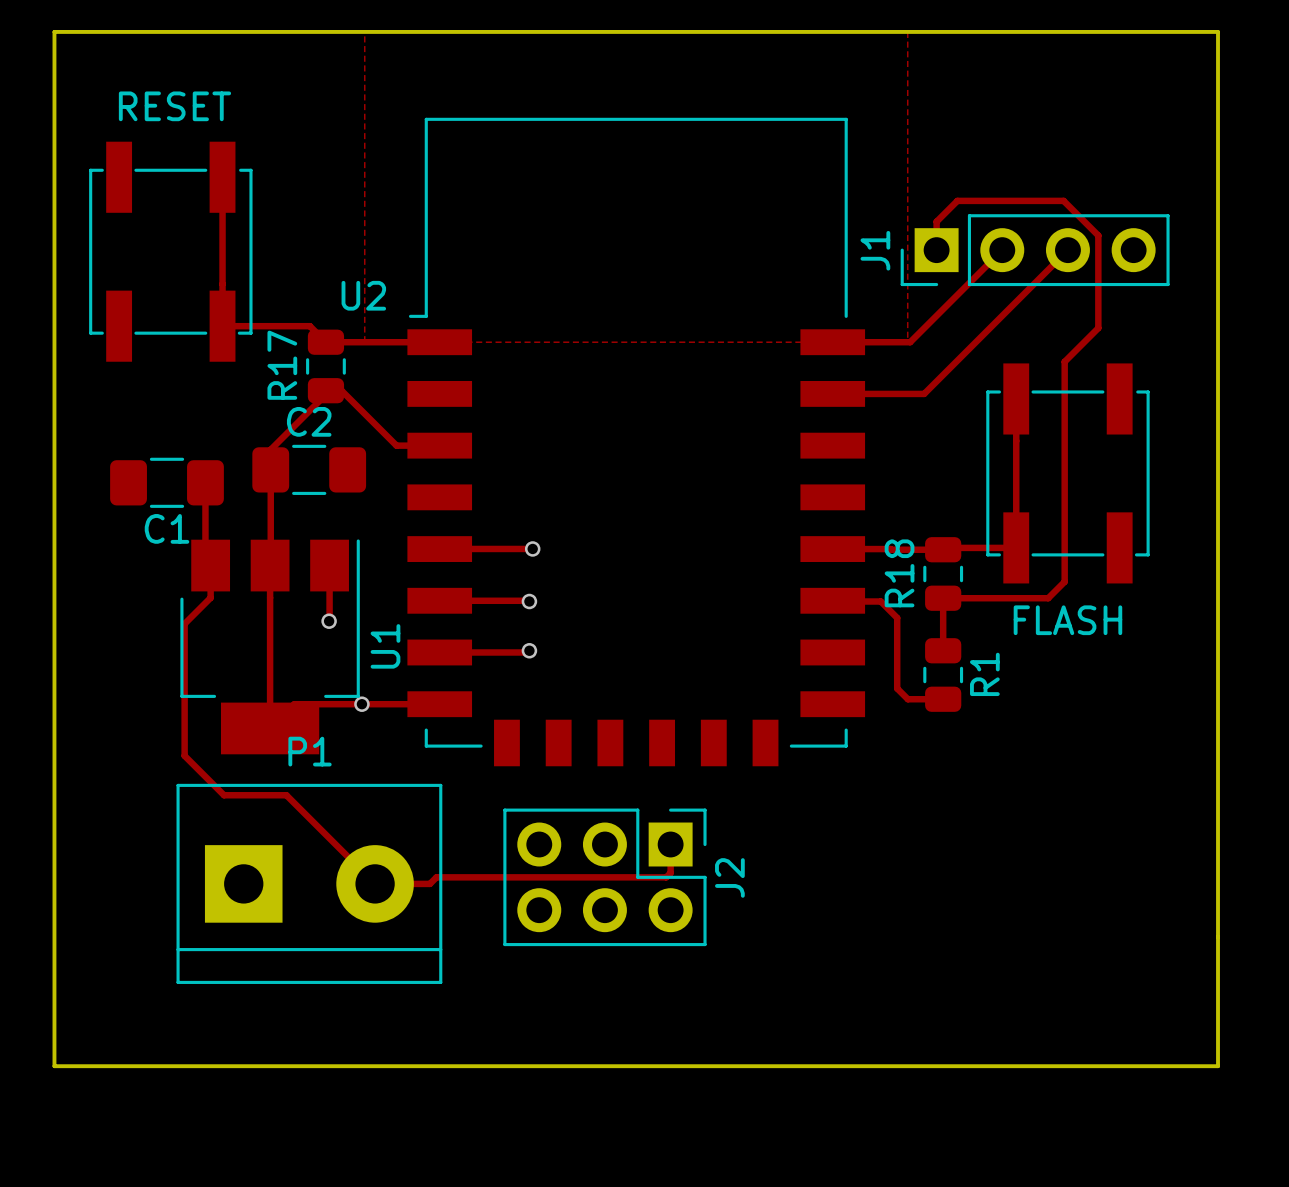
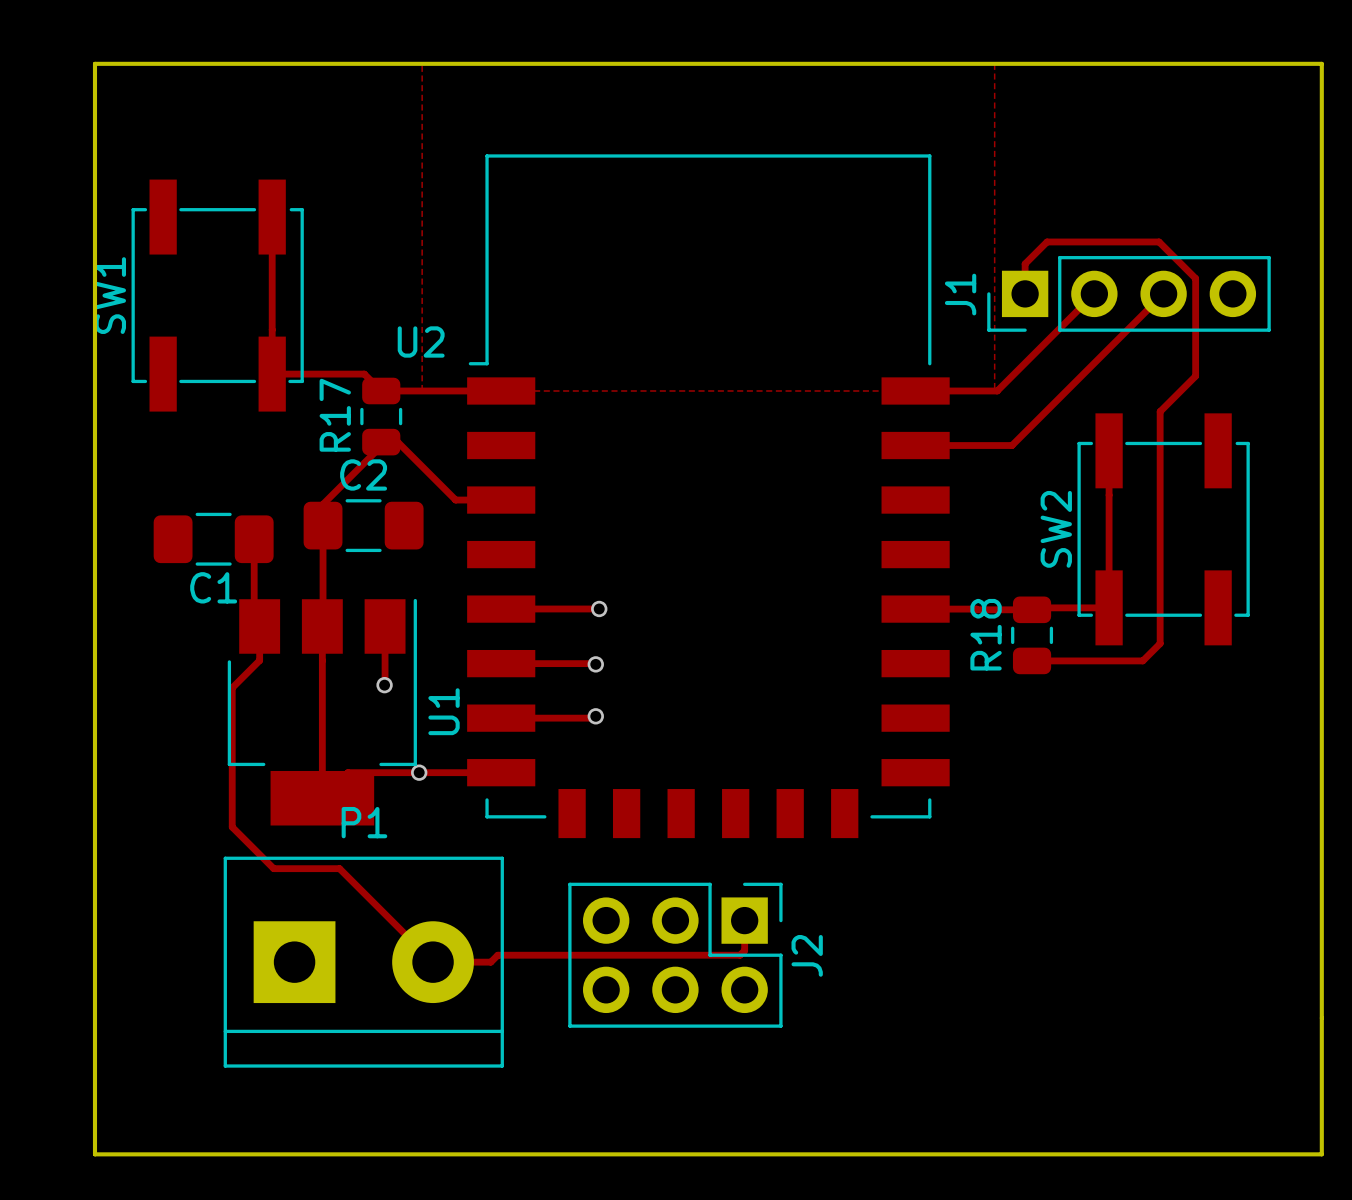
RESET name: RESET (174, 106) -> SW1 (110, 295)
track: (943, 598) (943, 650) -> none
track: (832, 600) (880, 601) (897, 617) (897, 688) (907, 699) (943, 699) -> none
FLASH name: FLASH (1067, 620) -> SW2 (1056, 529)
R1: (943, 675) -> none

